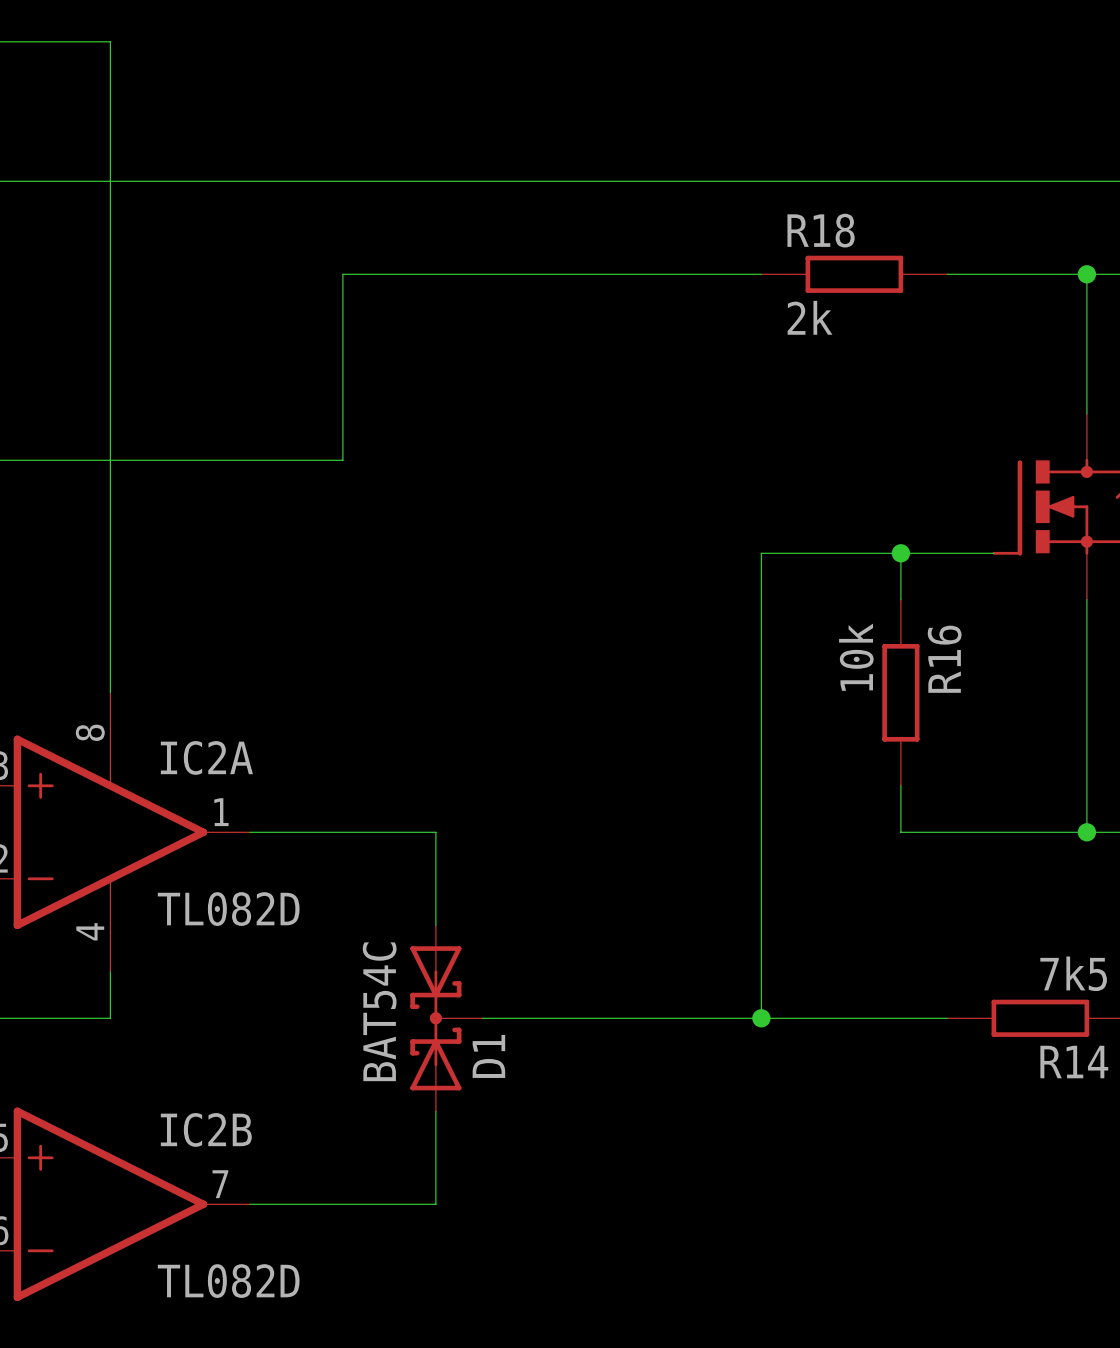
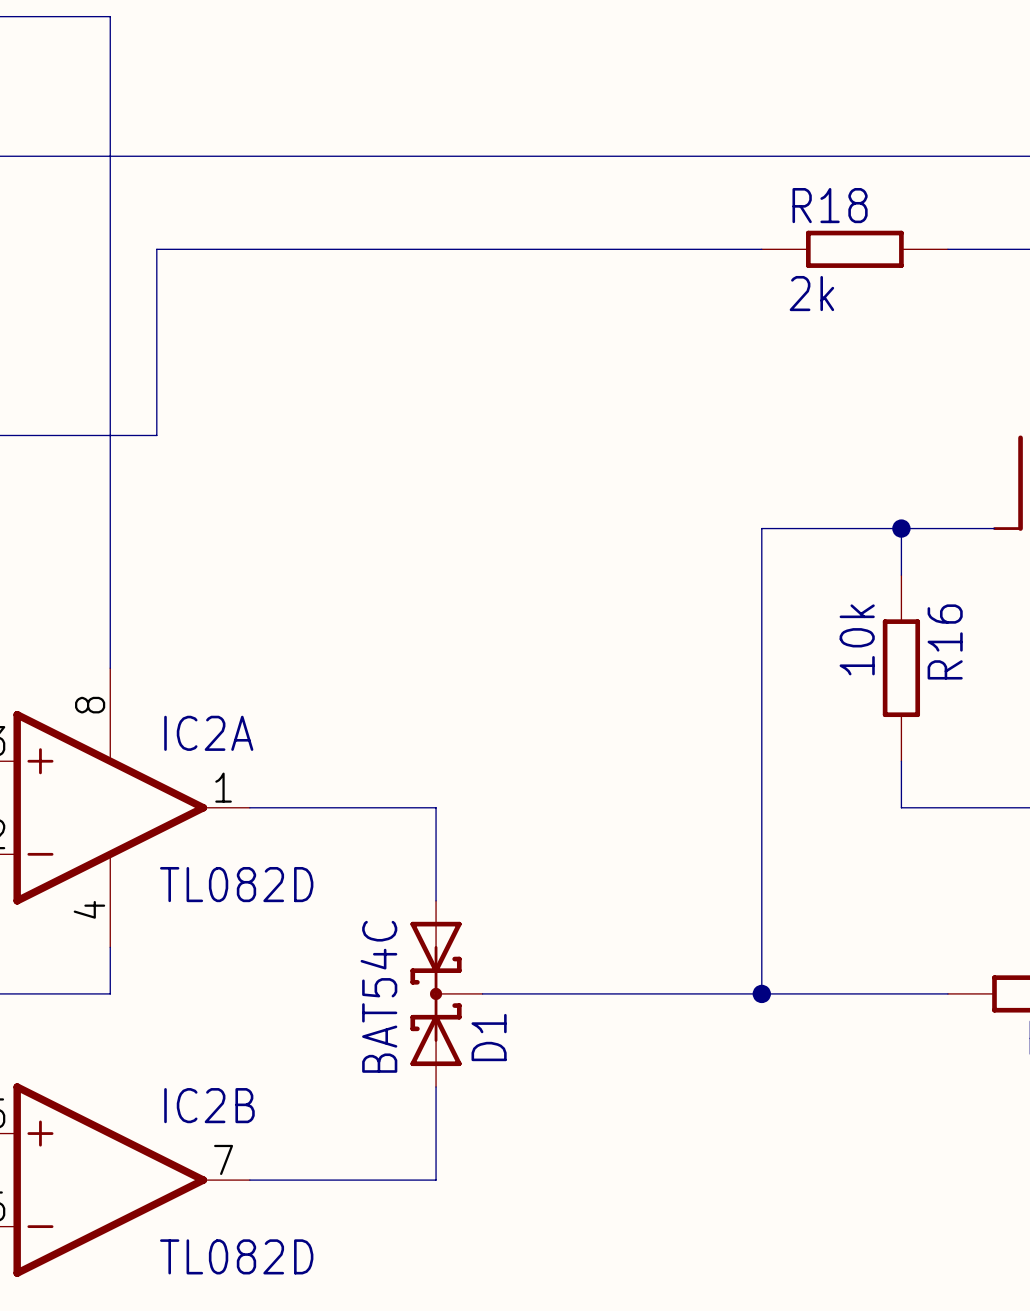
wire: (342, 274) (342, 460) (156, 460) -> (342, 249) (156, 249) (156, 435)

